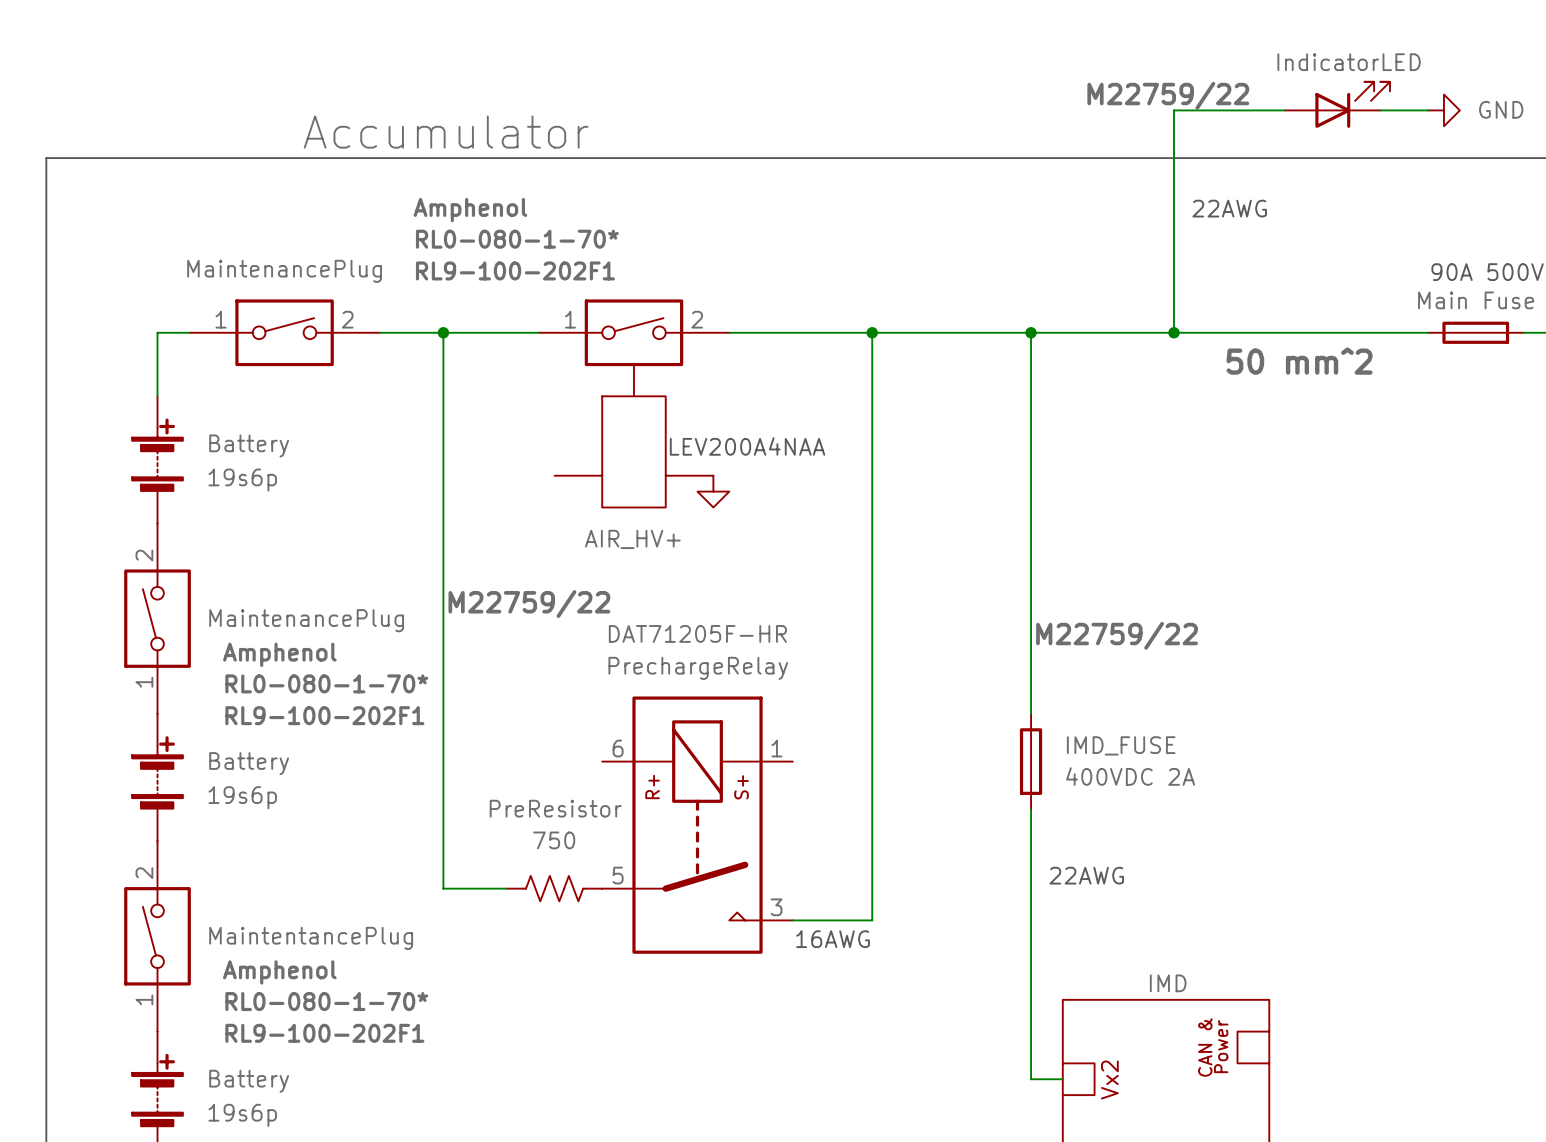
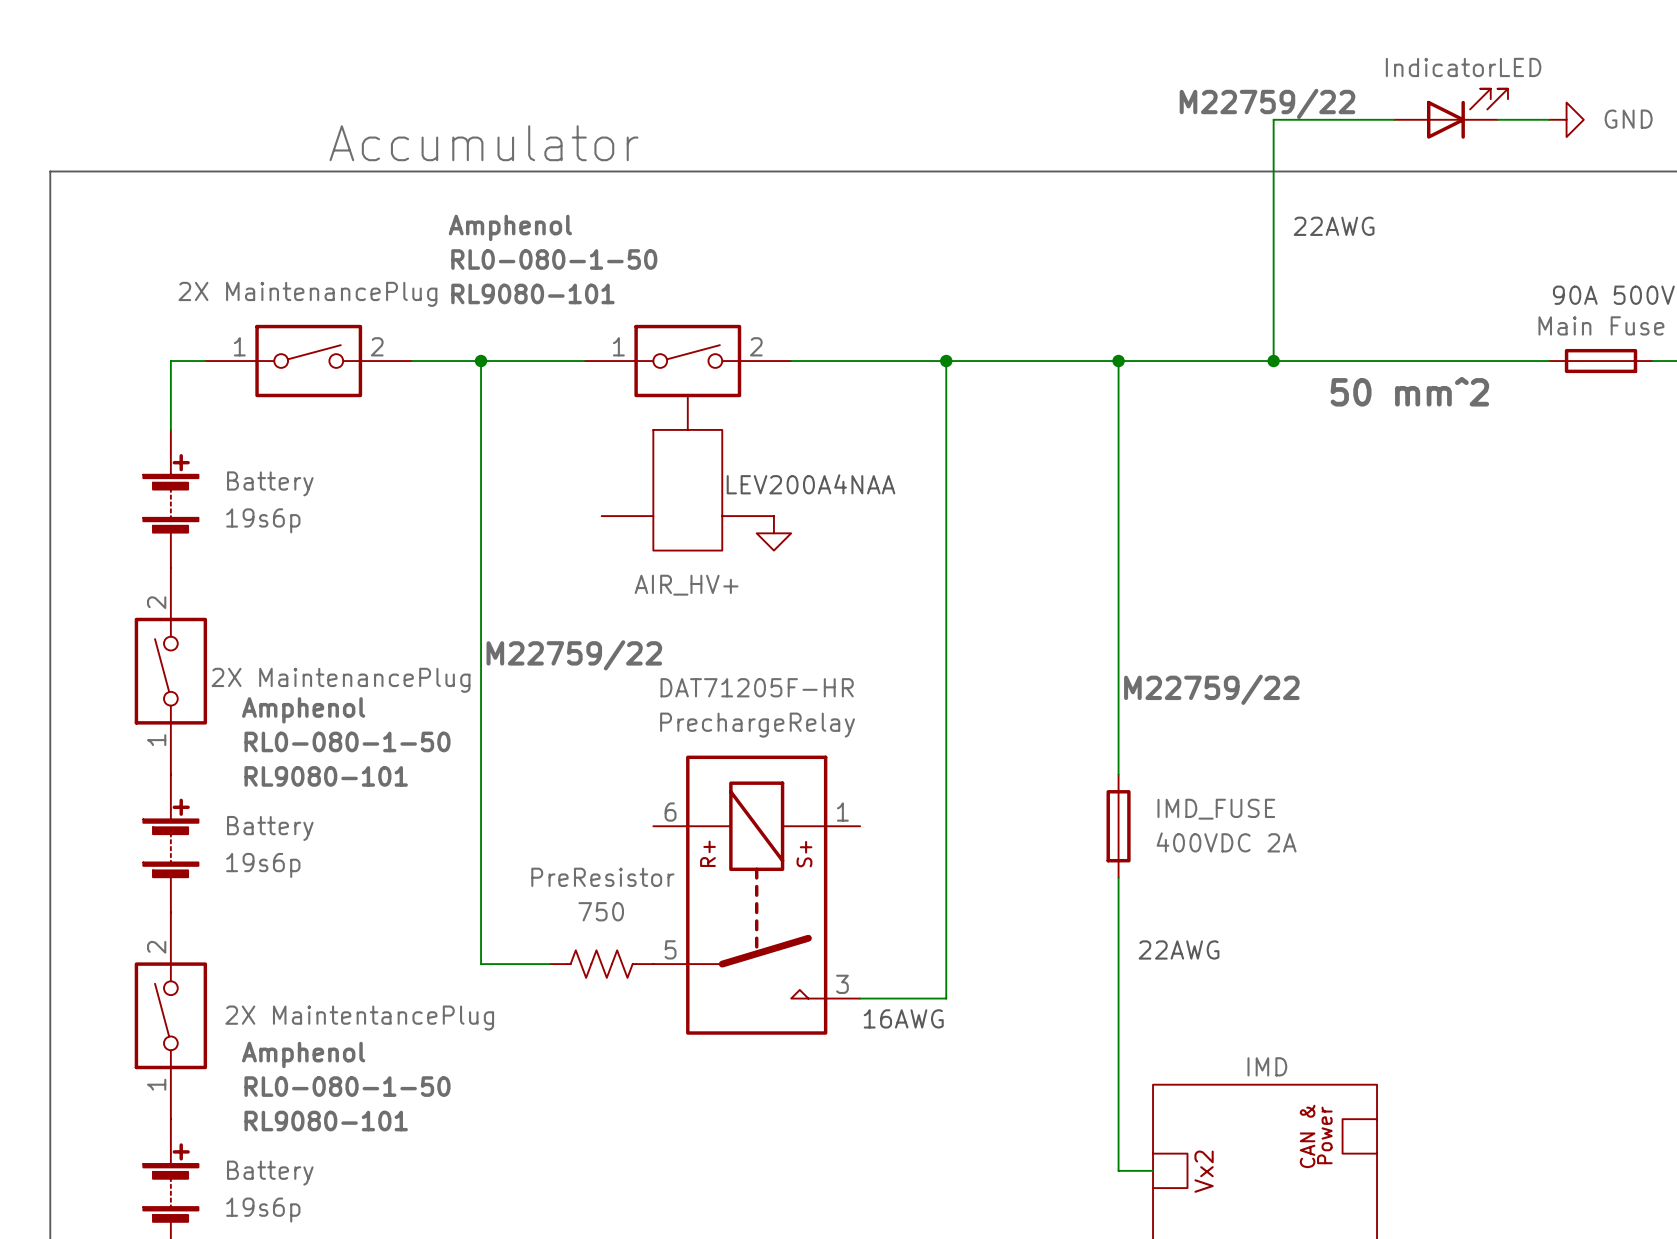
label: RL0-080-1-70* (517, 239) -> RL0-080-1-50 (554, 259)
label: RL9-100-202F1 (515, 270) -> RL9080-101 (532, 293)
part value: MaintenancePlug (284, 271) -> 2X MaintenancePlug (307, 294)
part value: MaintenancePlug (306, 620) -> 2X MaintenancePlug (341, 680)
label: RL0-080-1-70* (326, 683) -> RL0-080-1-50 (347, 741)
label: RL9-100-202F1 (324, 715) -> RL9080-101 (326, 776)
part value: MaintentancePlug (311, 938) -> 2X MaintentancePlug (359, 1018)
label: RL0-080-1-70* (326, 1001) -> RL0-080-1-50 (347, 1086)
label: RL9-100-202F1 (324, 1033) -> RL9080-101 (326, 1121)

